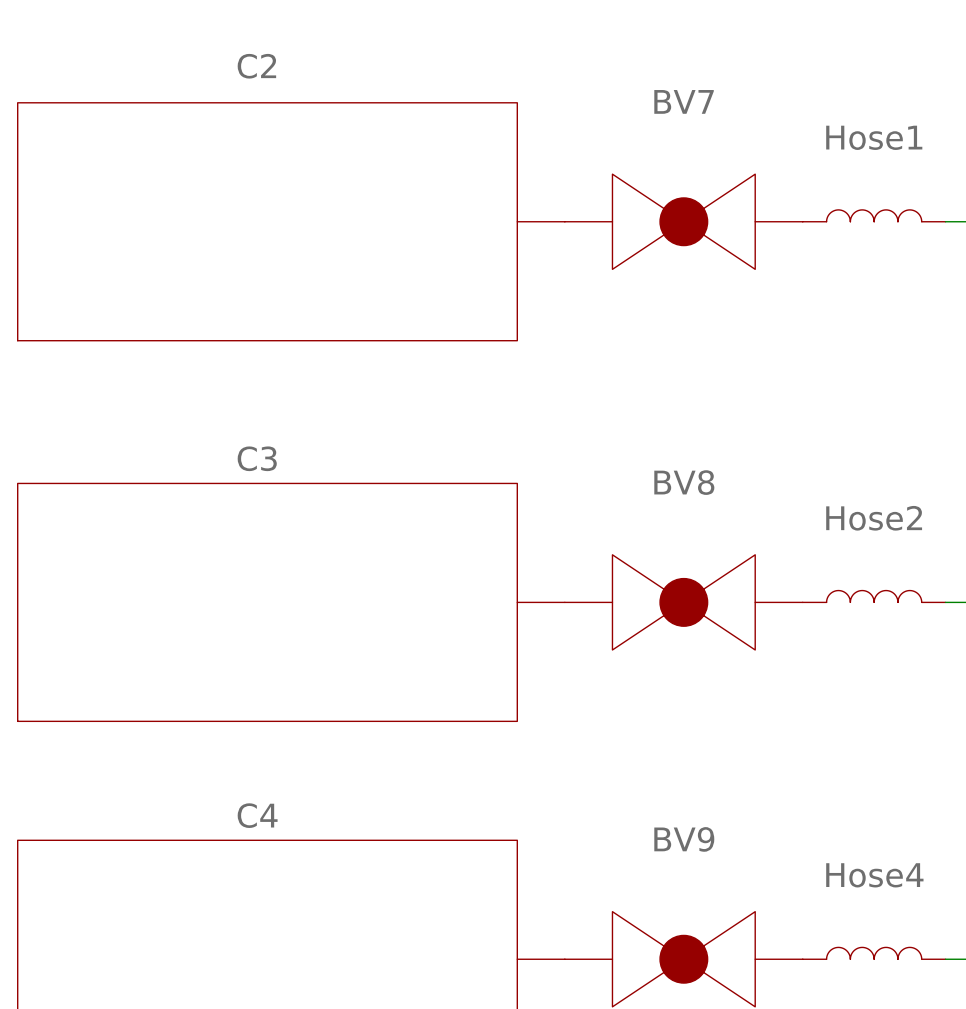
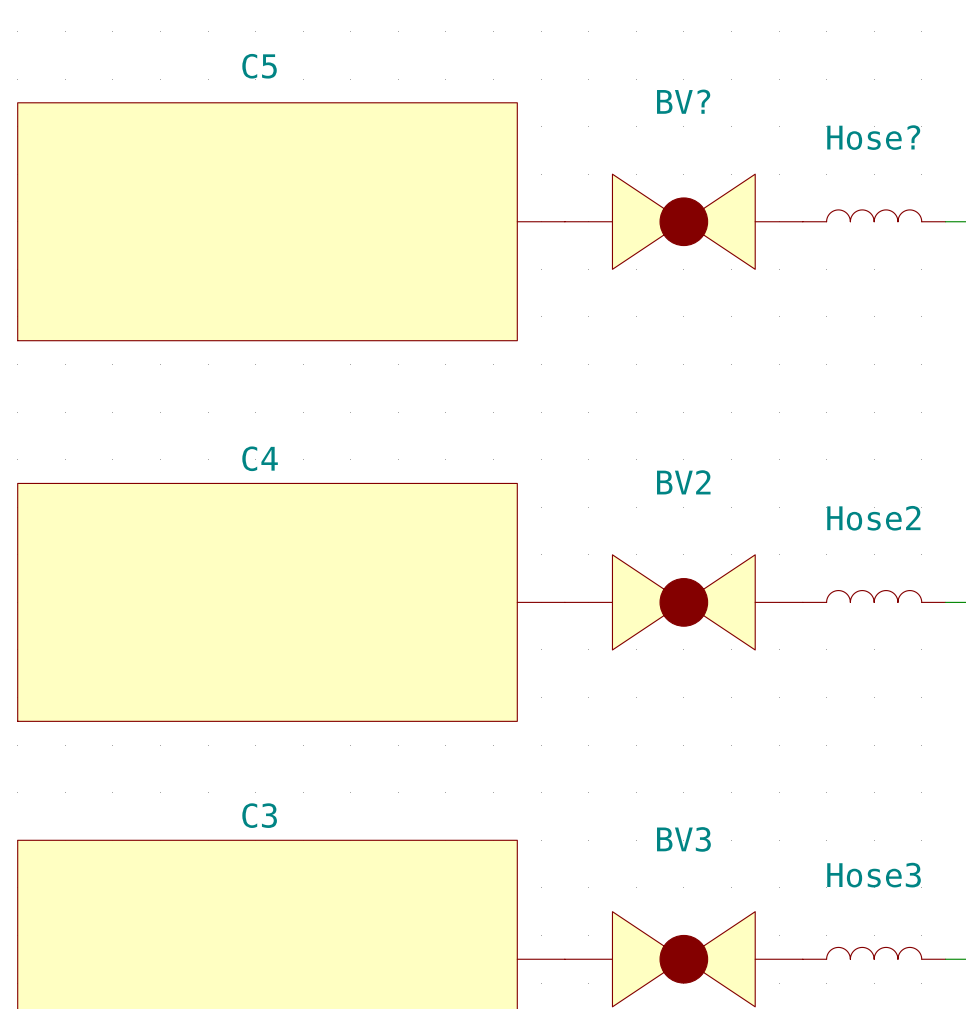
C2 name: C2 (256, 66) -> C5 (259, 66)
BV7 name: BV7 (684, 101) -> BV? (683, 101)
Hose1 name: Hose1 (874, 137) -> Hose? (873, 137)
C3 name: C3 (257, 458) -> C4 (260, 458)
BV8 name: BV8 (684, 482) -> BV2 (683, 482)
C4 name: C4 (257, 815) -> C3 (259, 815)
BV9 name: BV9 (684, 839) -> BV3 (683, 839)
Hose4 name: Hose4 (874, 875) -> Hose3 (874, 875)

